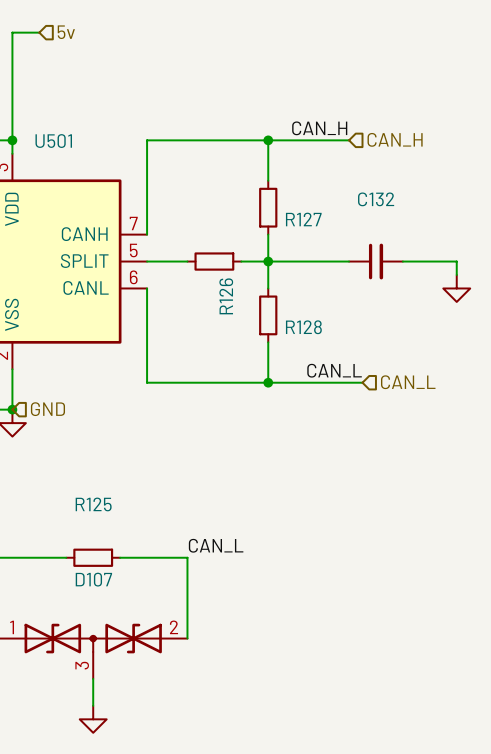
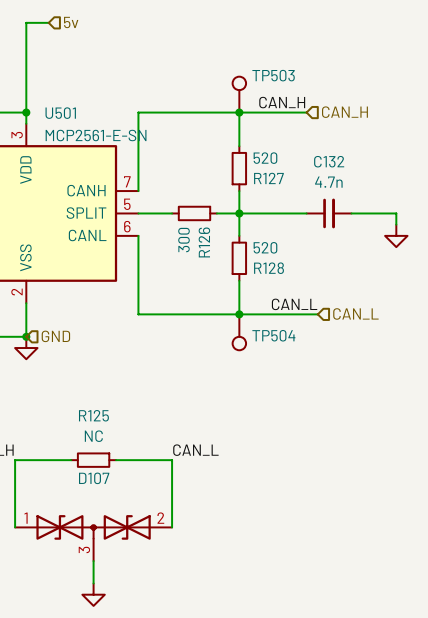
TP503: none -> (239, 94)
U501 value: none -> MCP2561-E-SN (96, 135)
R127 value: none -> 520 (265, 158)
C132 value: none -> 4.7n (328, 182)
R126 value: none -> 300 (183, 240)
R128 value: none -> 520 (265, 247)
TP504: none -> (239, 332)
R125 value: none -> NC (93, 436)

